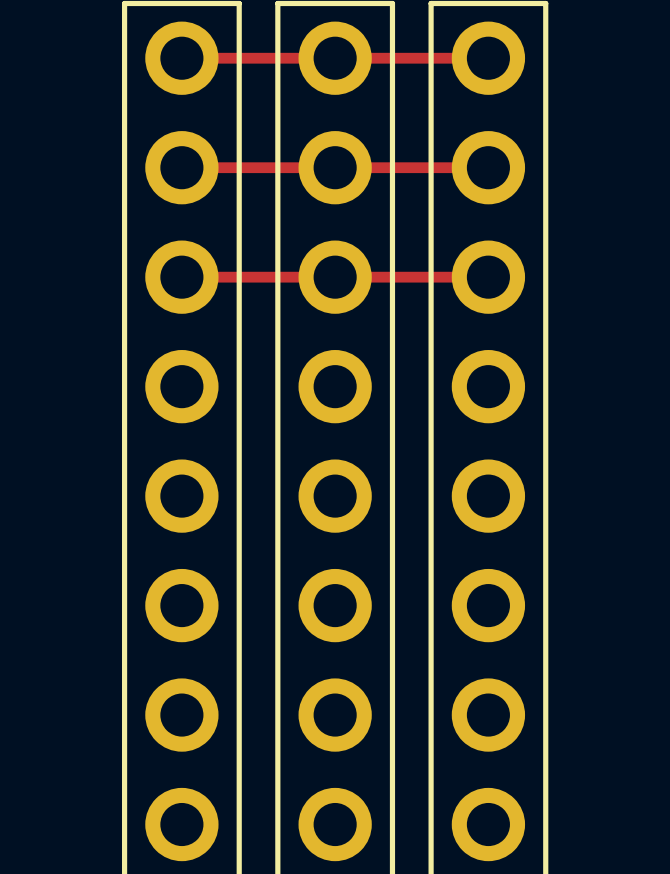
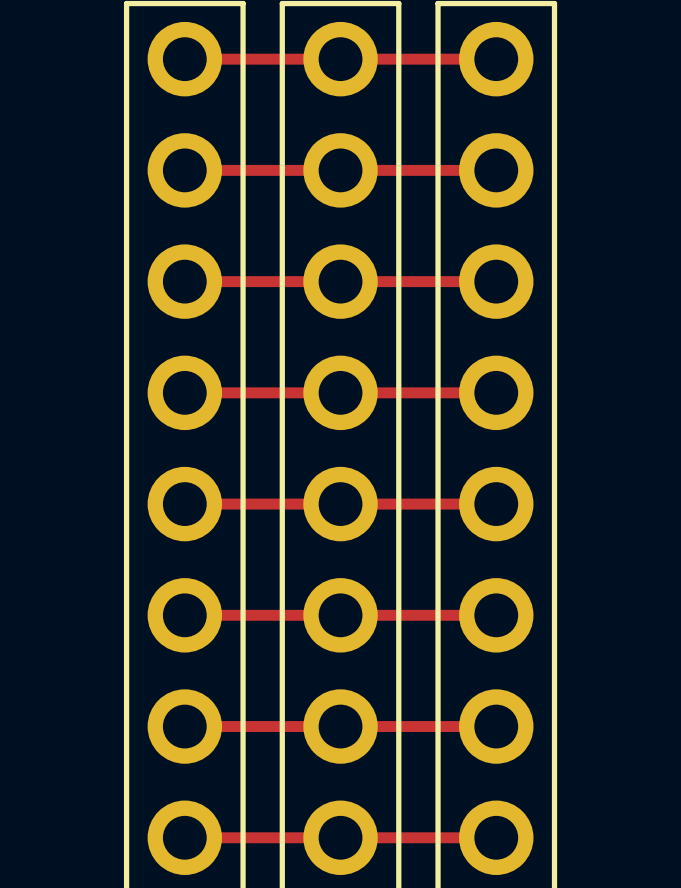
top track: none -> (184, 392) (496, 392)
top track: none -> (184, 504) (496, 504)
top track: none -> (184, 615) (496, 615)
top track: none -> (184, 726) (496, 726)
top track: none -> (184, 837) (496, 837)

